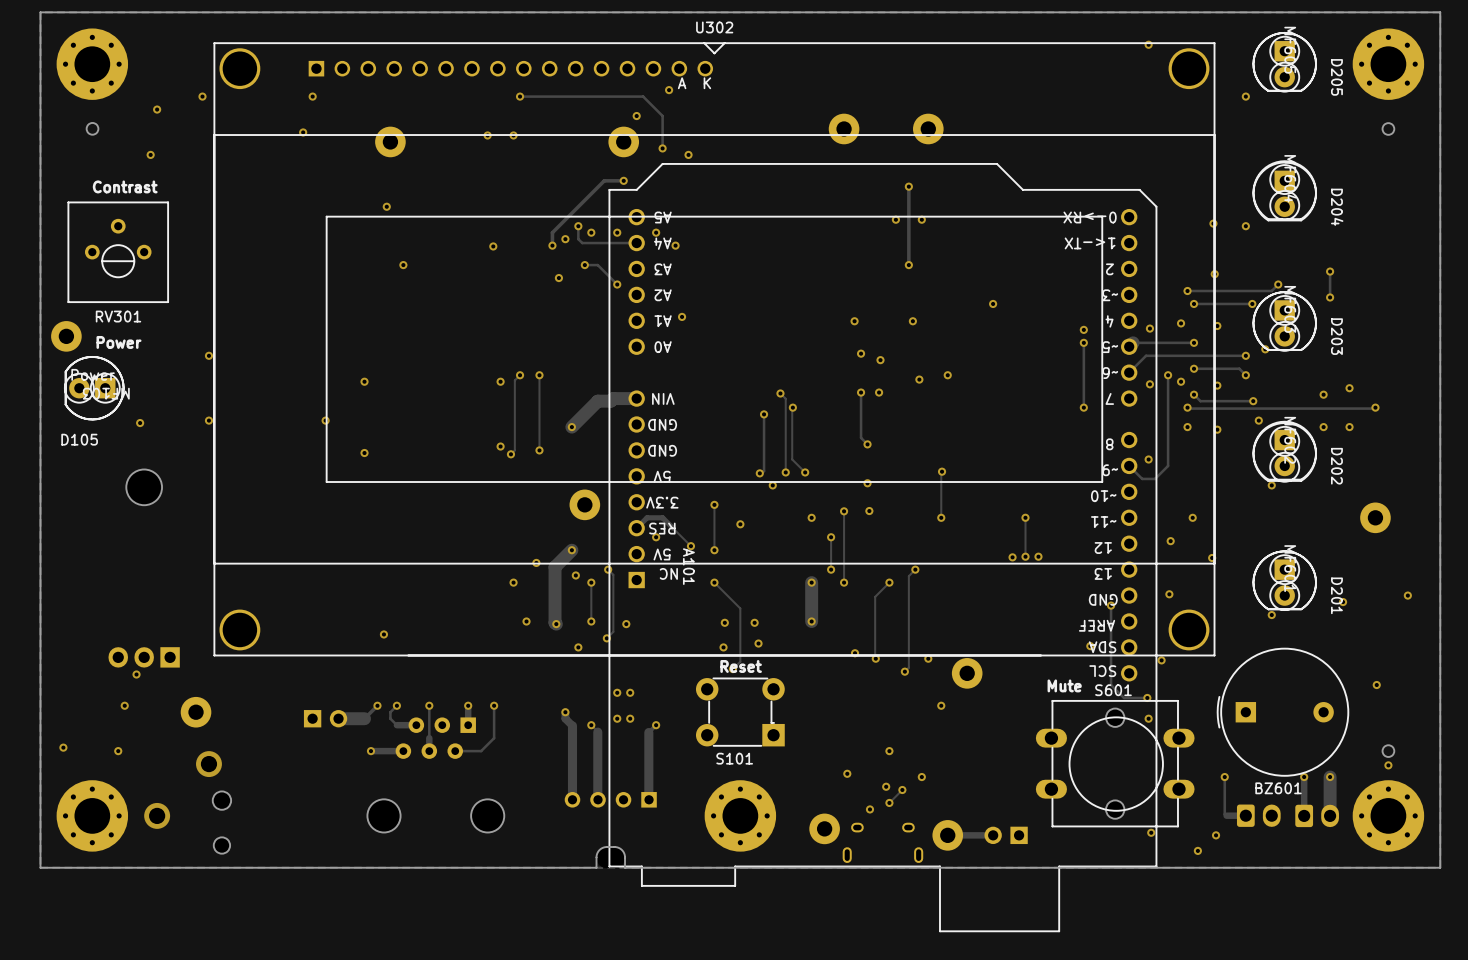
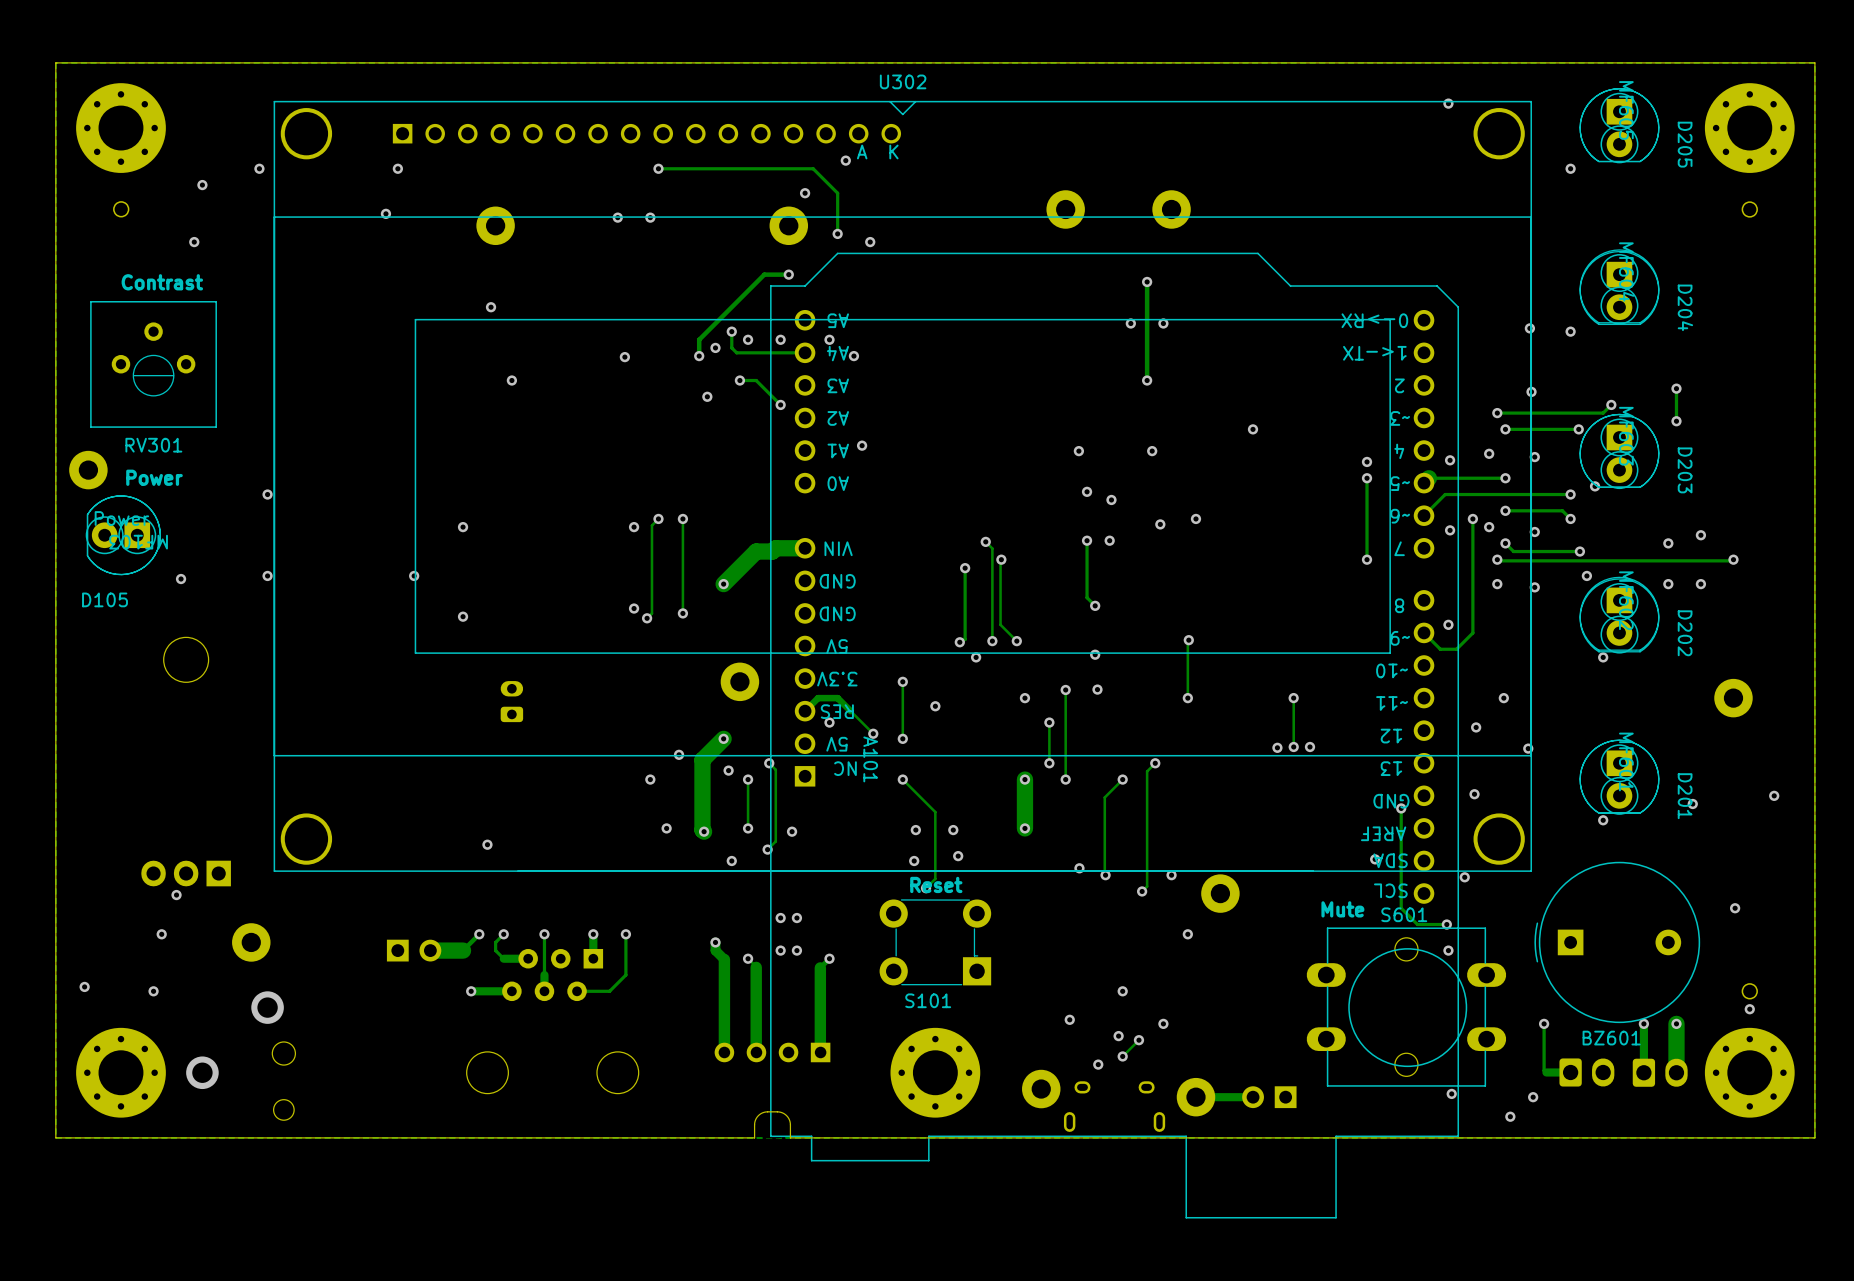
part: none -> (511, 701)

